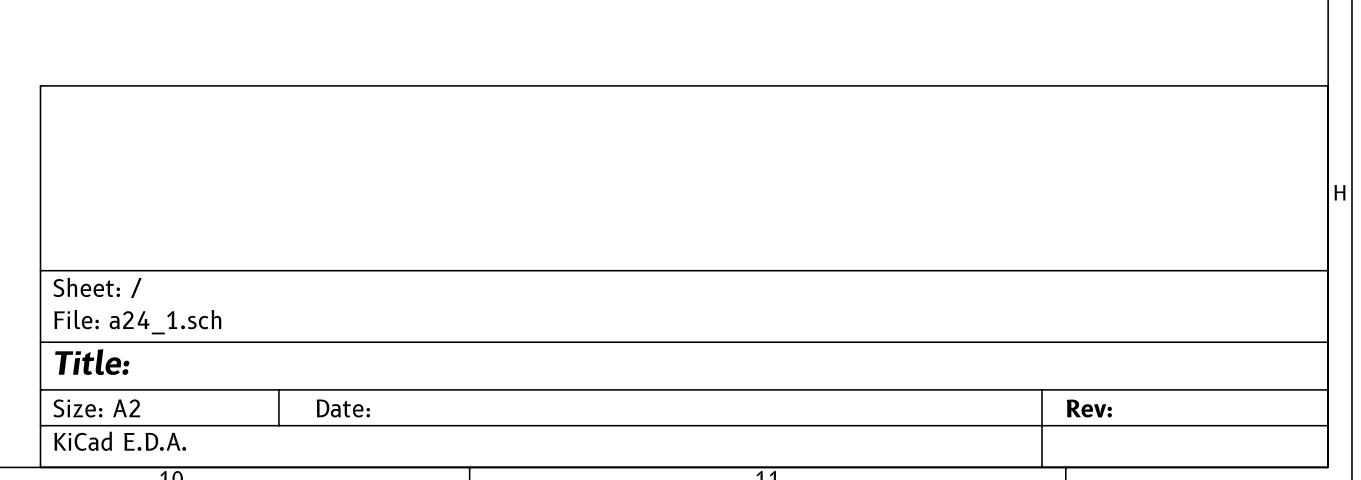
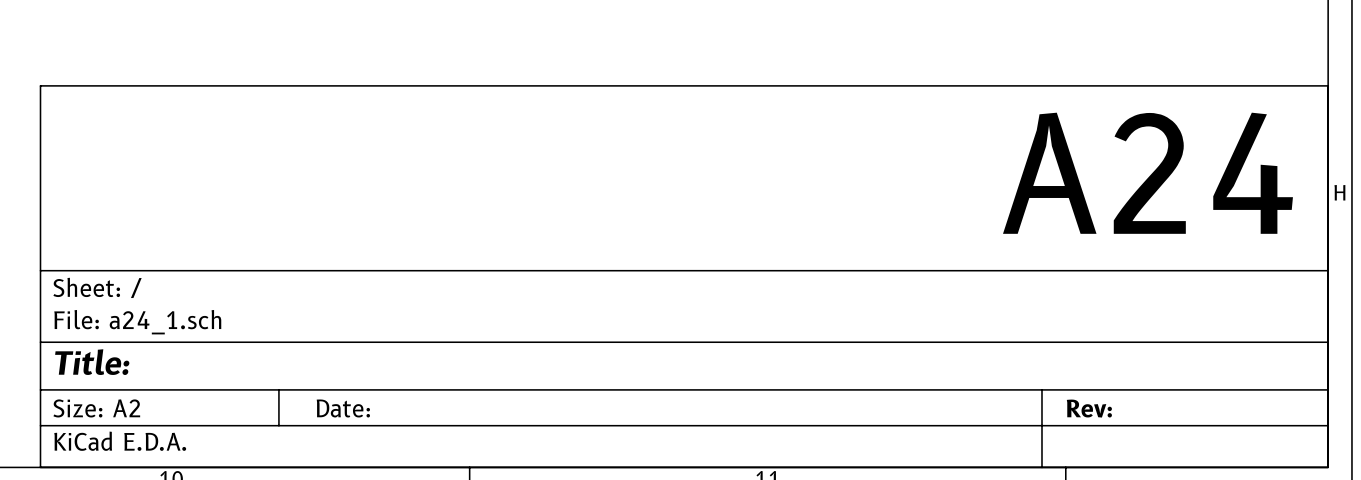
text: none -> A24 (1147, 173)

